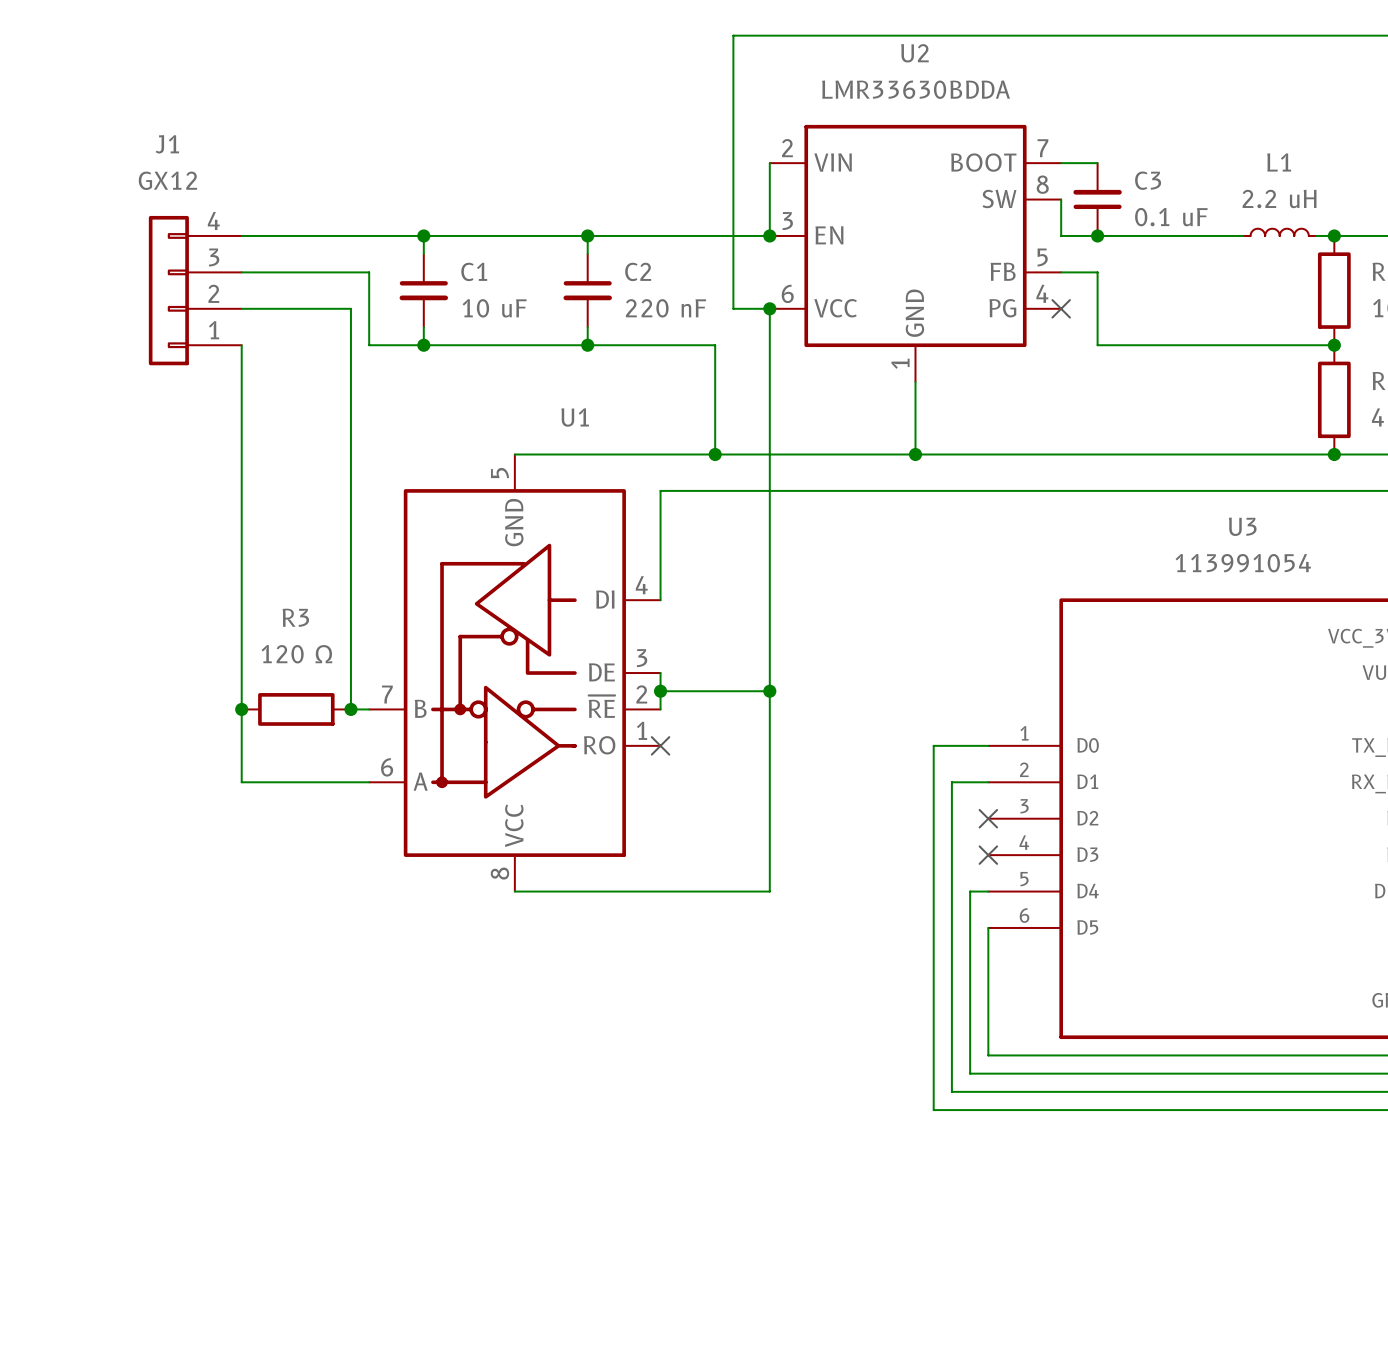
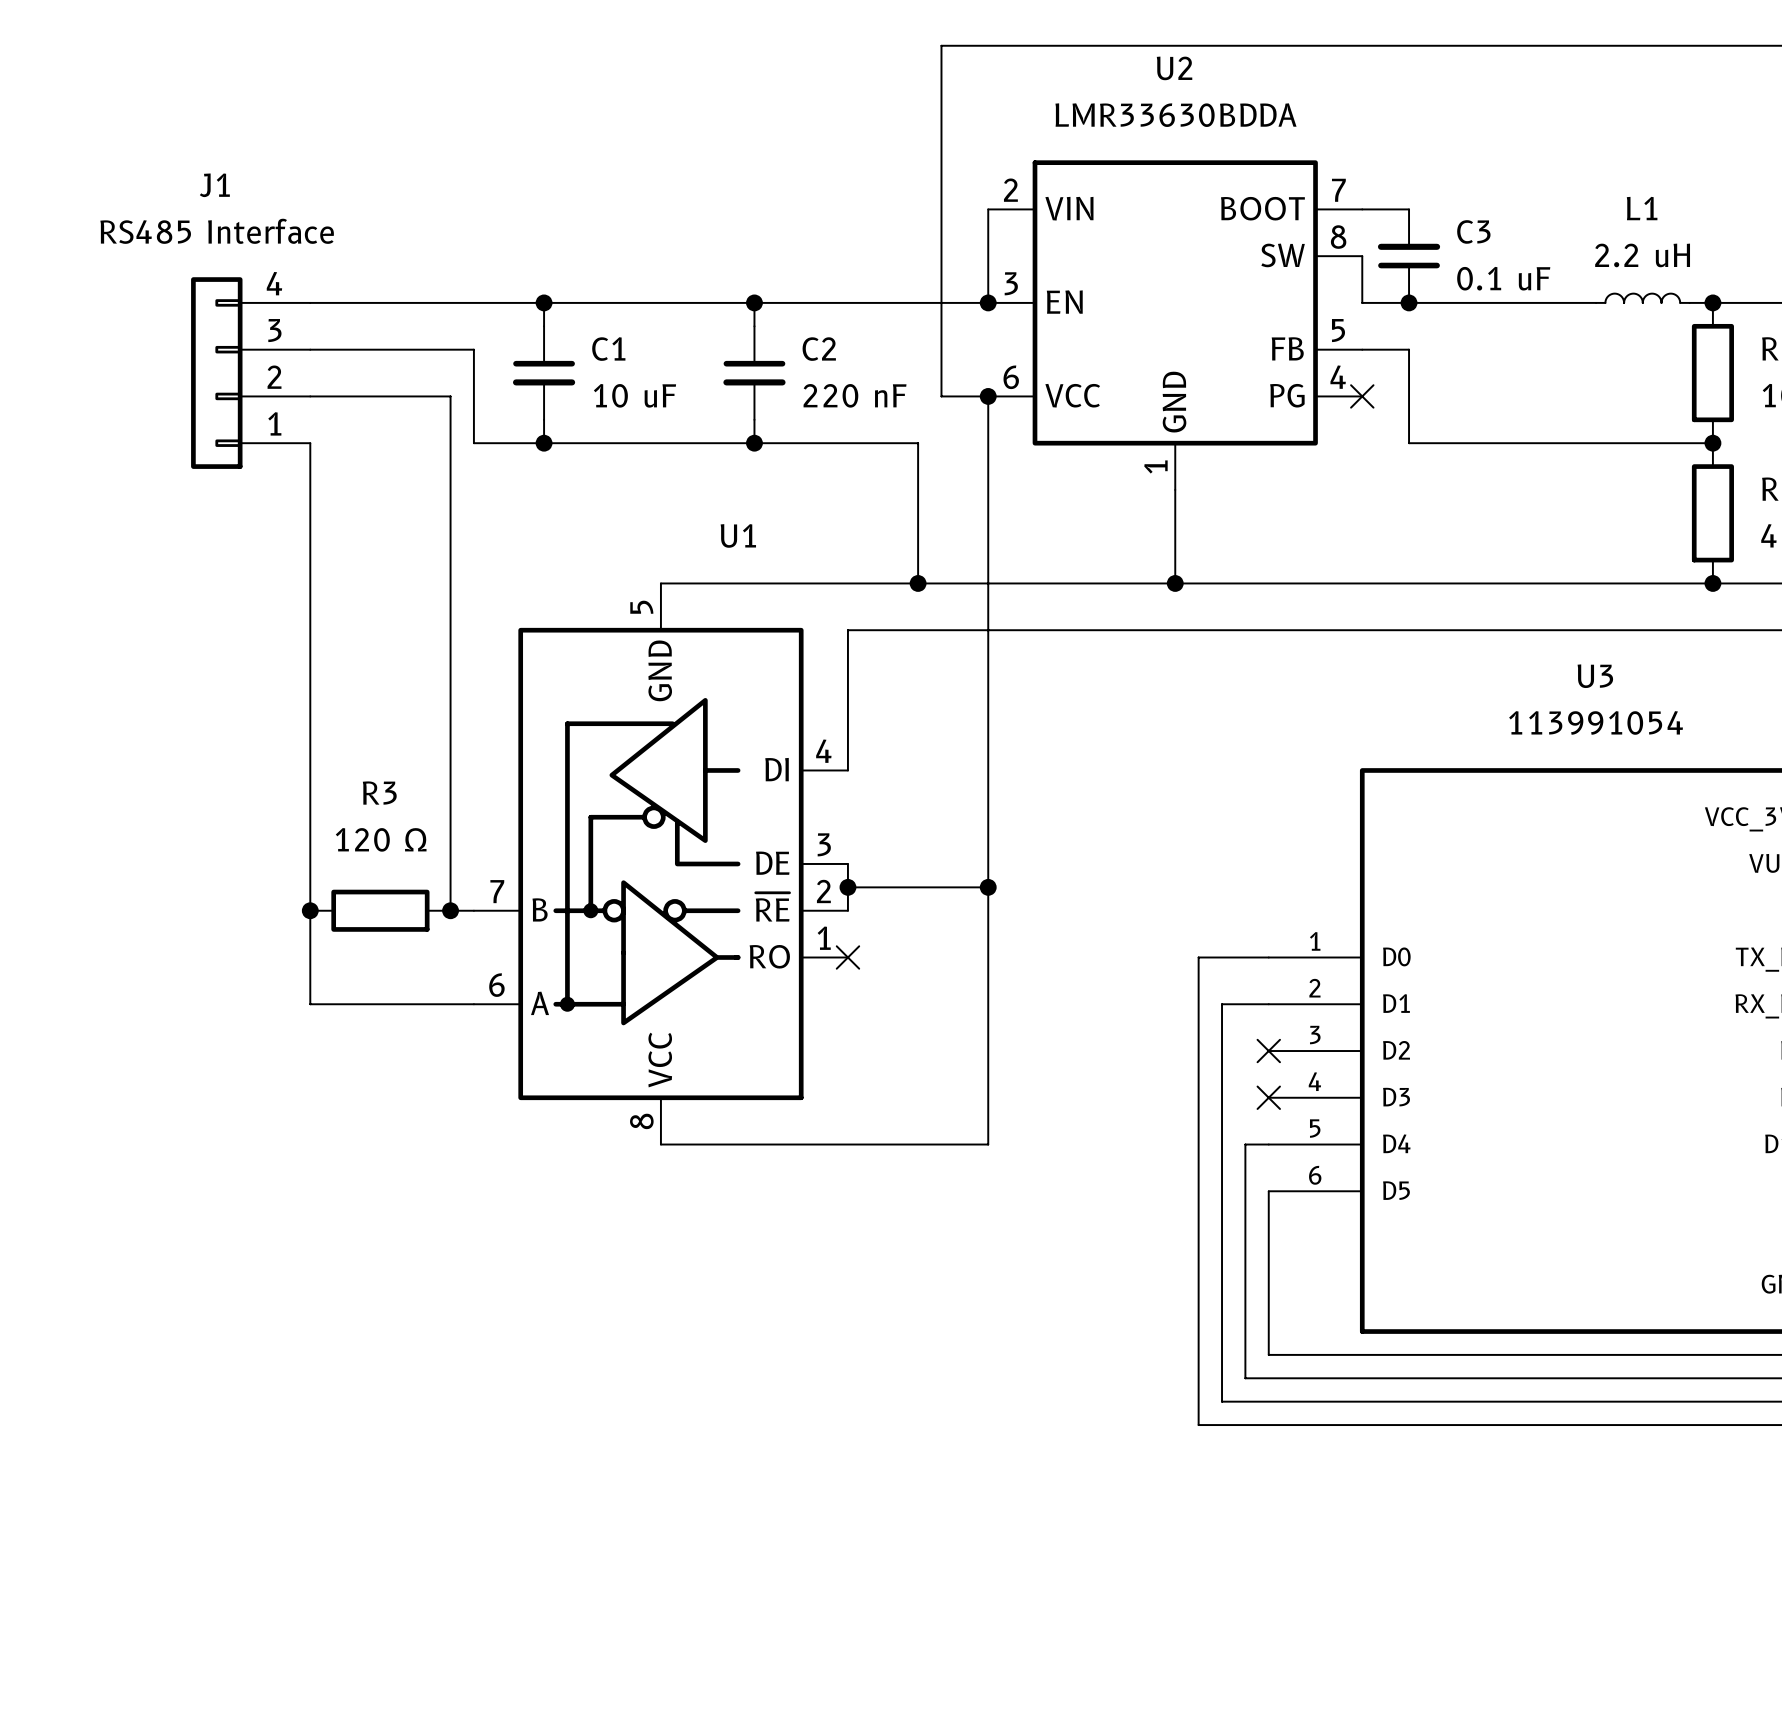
J1 value: GX12 (167, 180) -> RS485 Interface (217, 231)

